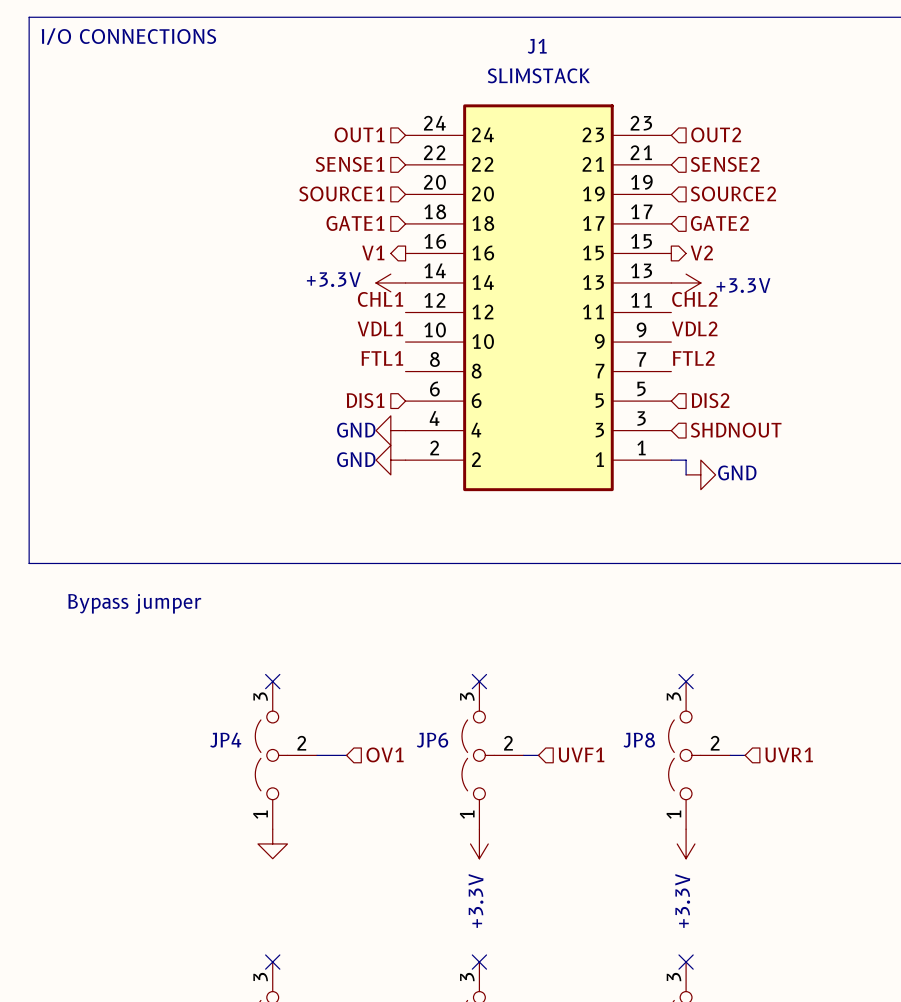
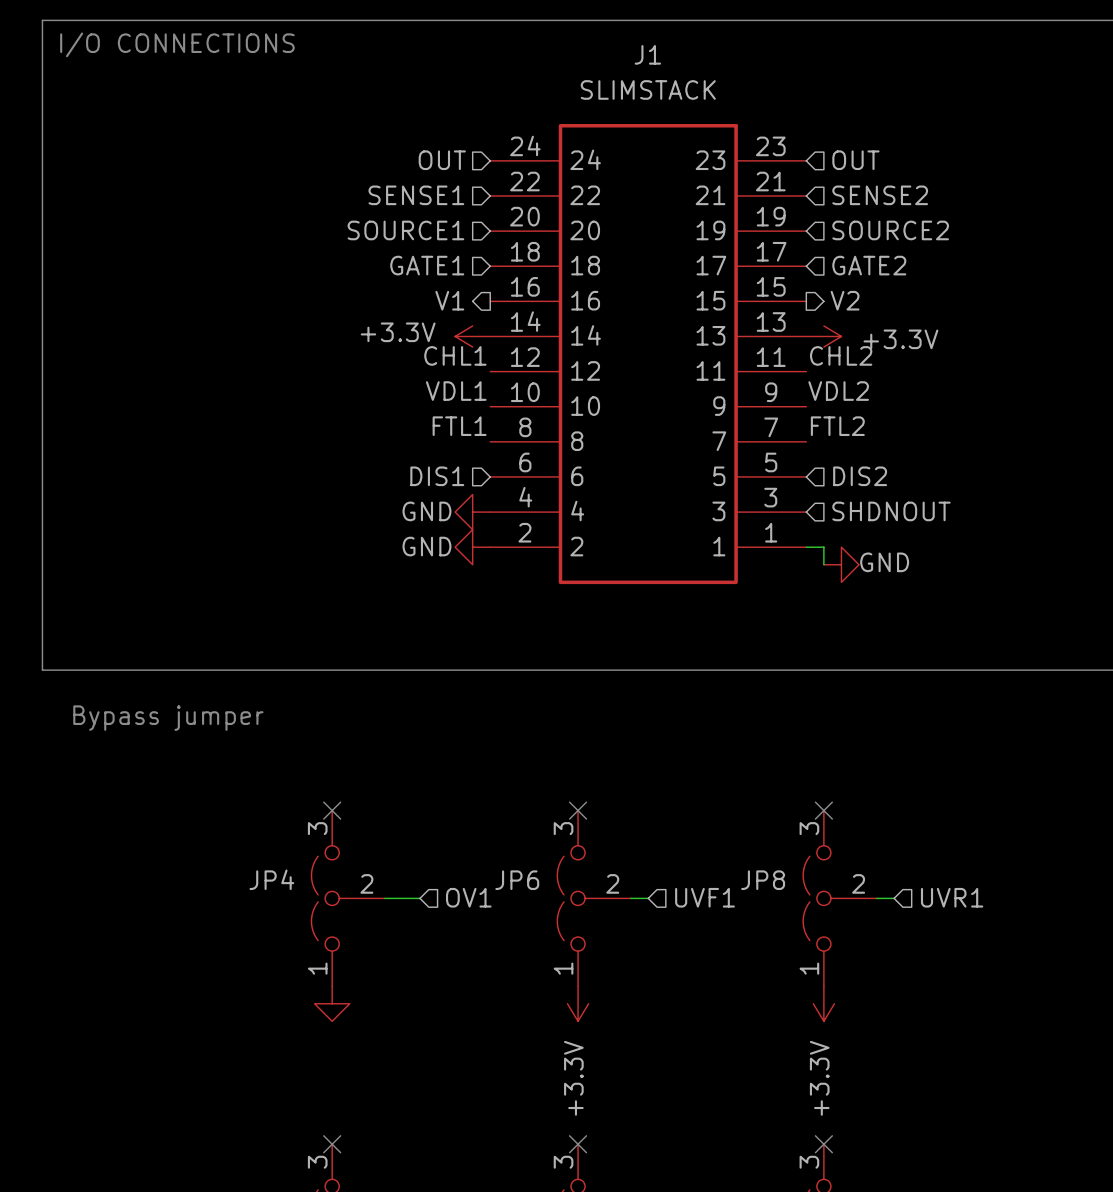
hierarchical label: OUT1 (359, 134) -> OUT (442, 160)
hierarchical label: OUT2 (716, 134) -> OUT (855, 160)

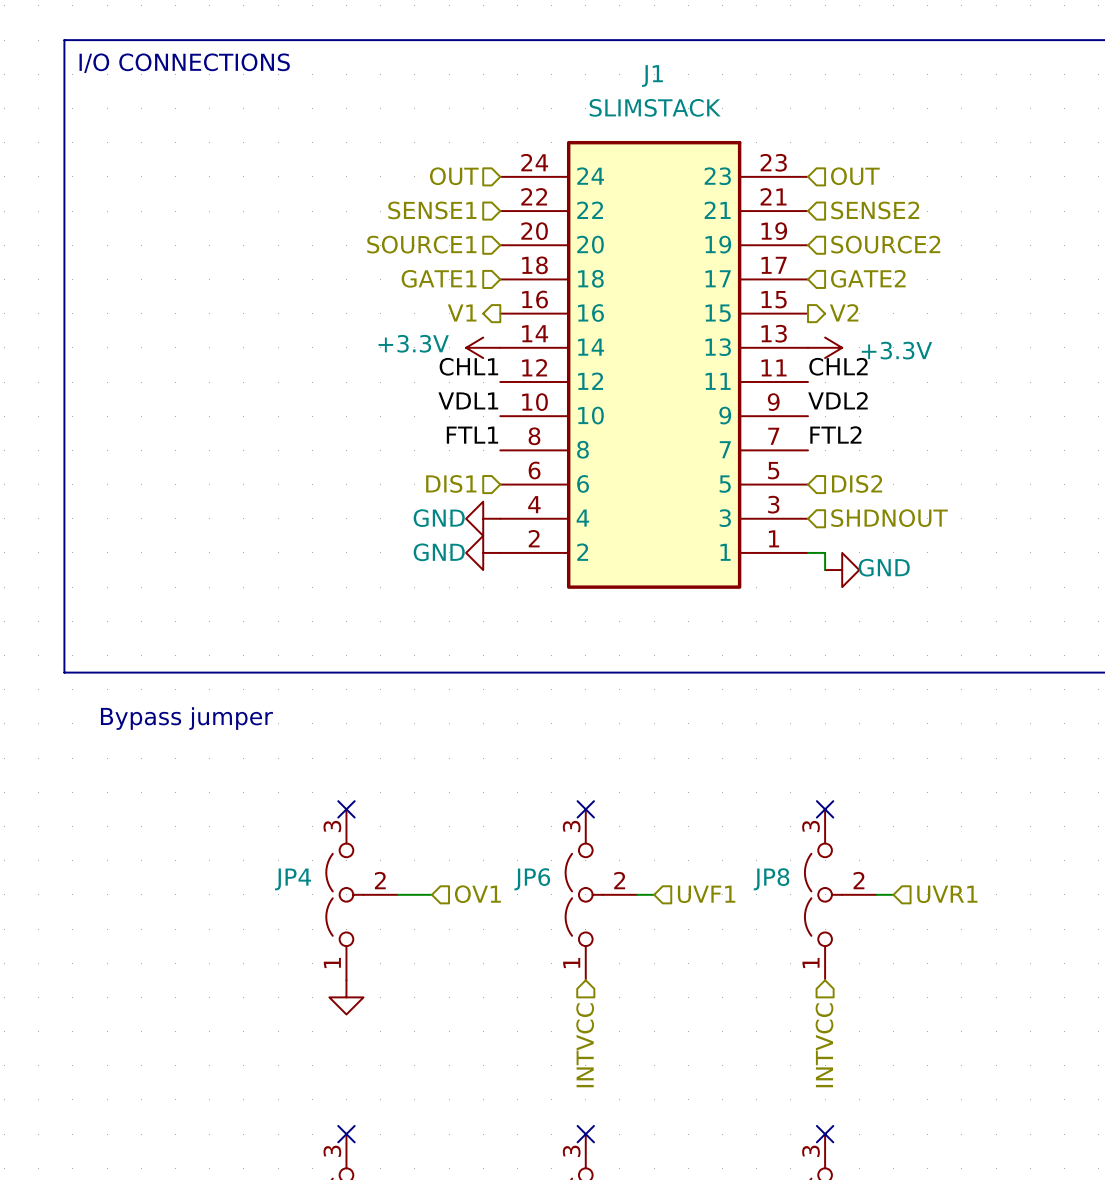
power symbol: +3.3V (578, 1003) -> none
power symbol: +3.3V (823, 1003) -> none
hierarchical label: none -> INTVCC (585, 1045)
hierarchical label: none -> INTVCC (824, 1045)

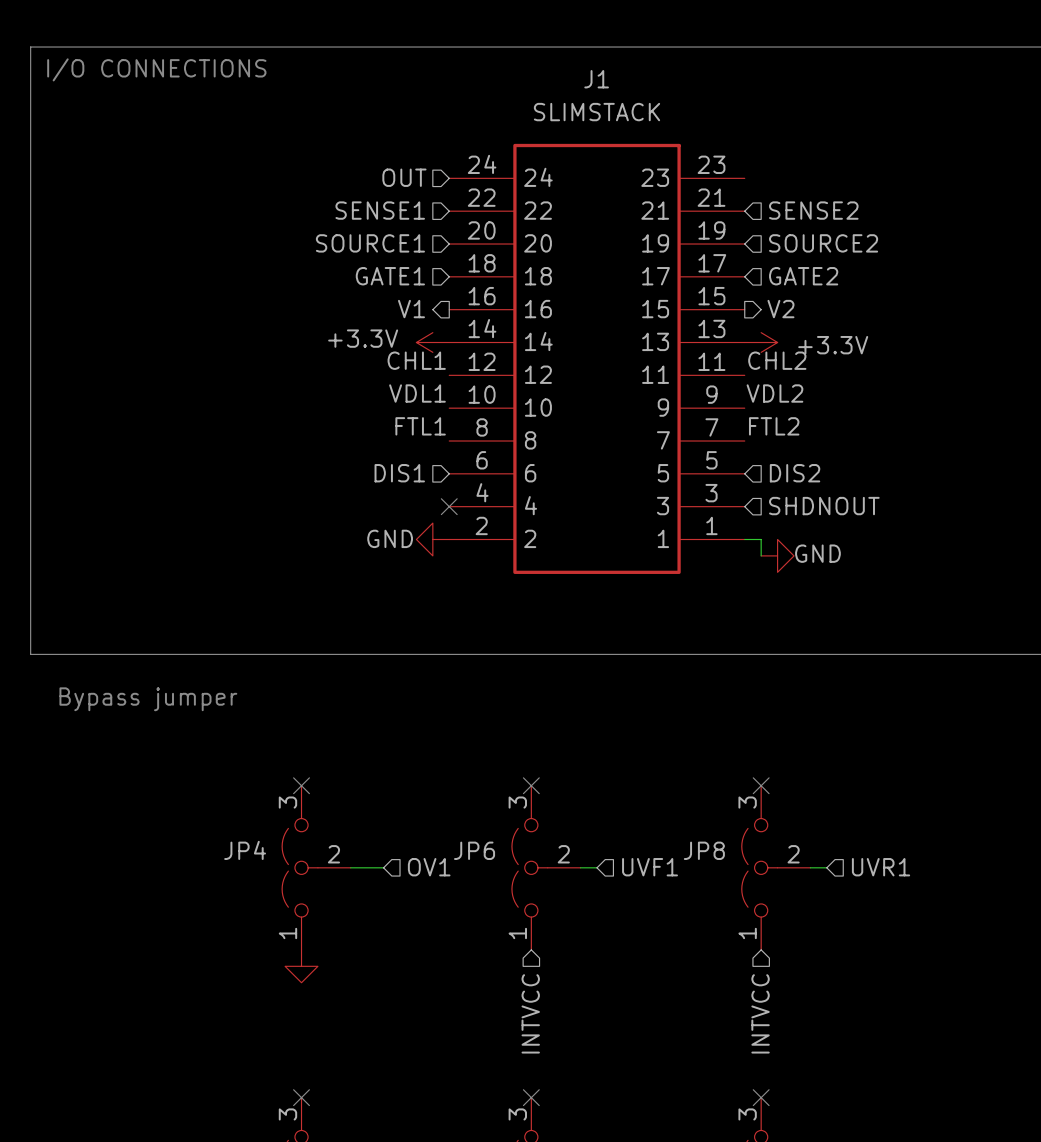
hierarchical label: OUT (855, 176) -> none
power symbol: GND (483, 518) -> none
no-connect mark: none -> (449, 506)

